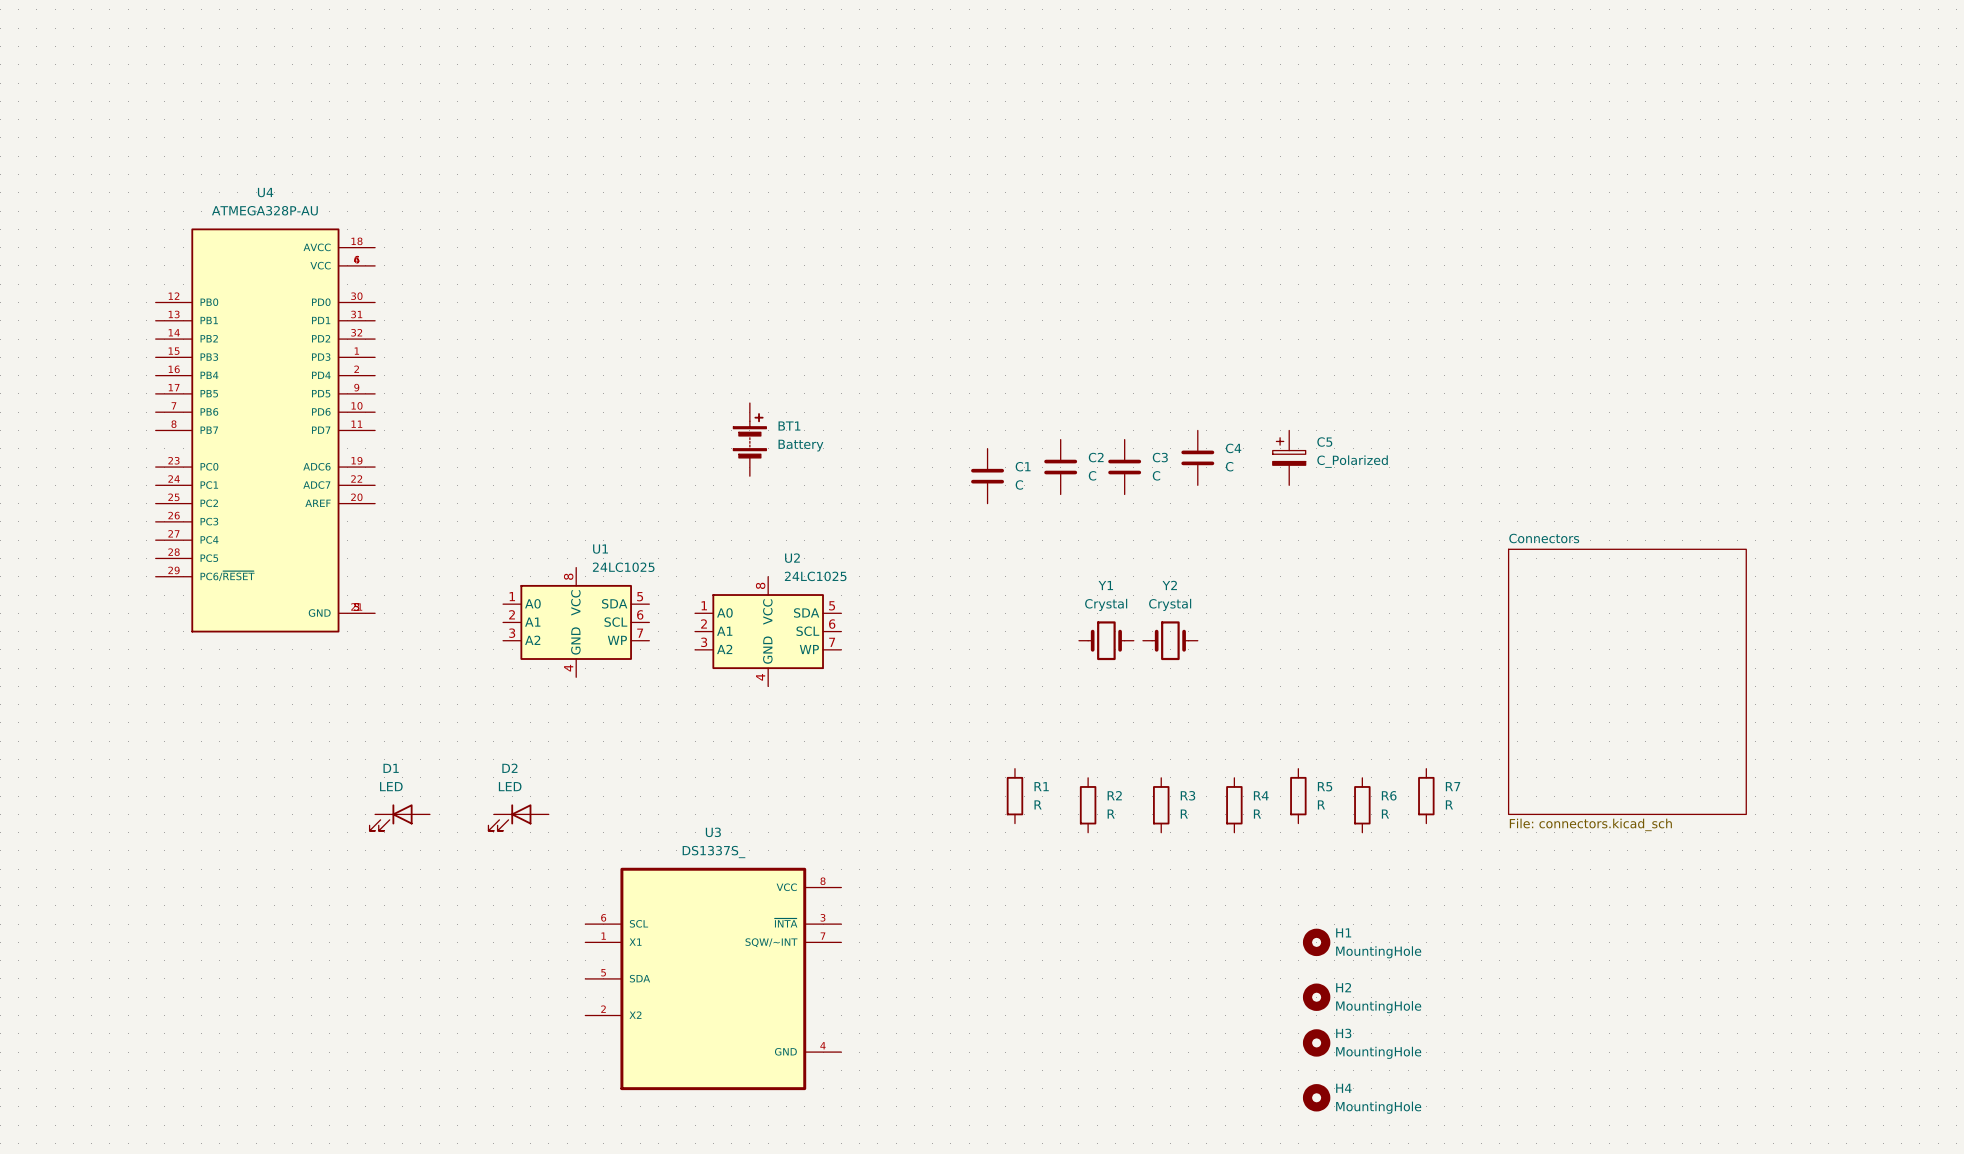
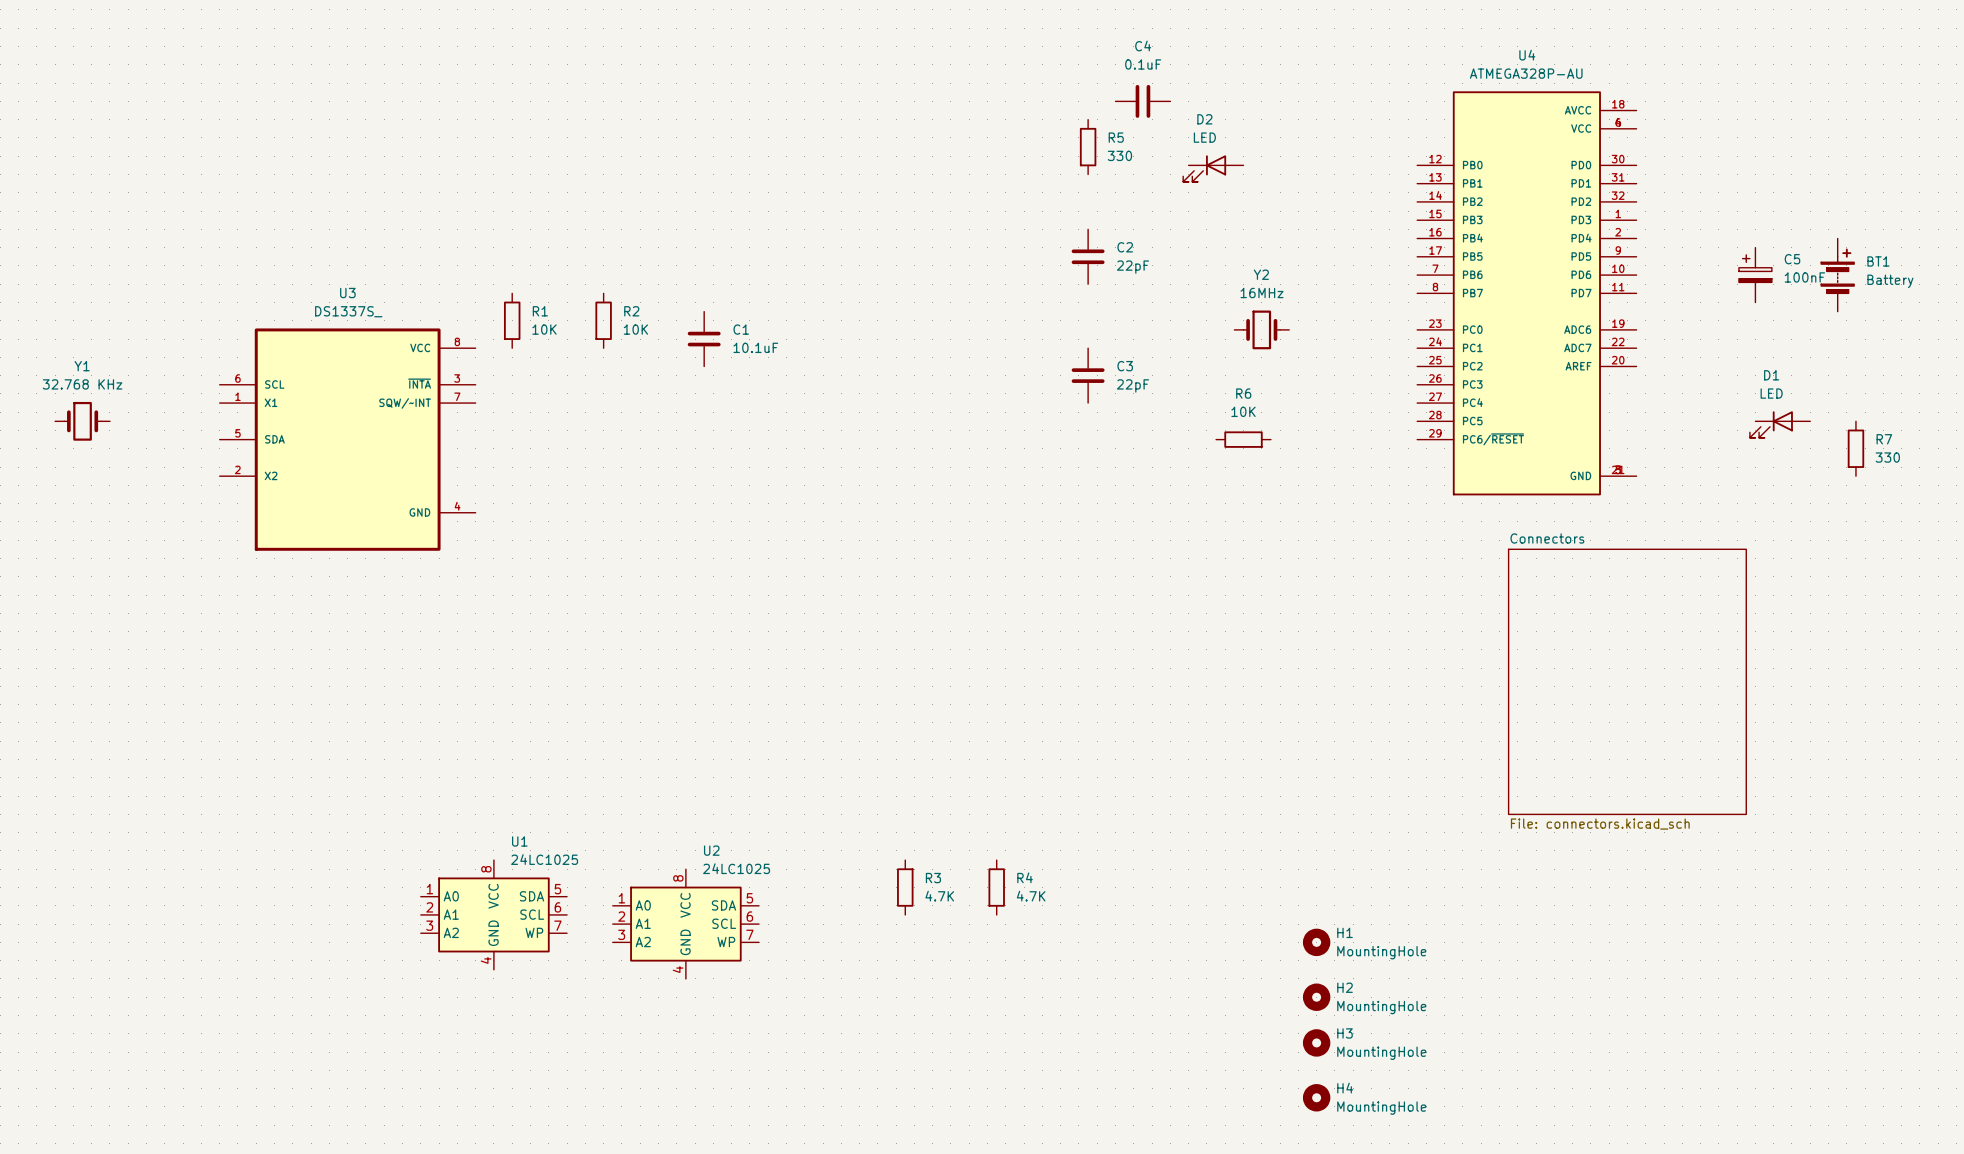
U4 position: (265, 430) -> (1526, 293)
BT1 position: (749, 439) -> (1837, 275)
C4 name position: C4 (1233, 448) -> C4 (1143, 45)
C4 rotation: 0° (1197, 457) -> 90° clockwise (1142, 101)
C4 position: (1197, 457) -> (1142, 101)
C5 position: (1289, 457) -> (1755, 275)
C5 value: C_Polarized (1352, 461) -> 100nF (1804, 277)
C4 value: C (1229, 466) -> 0.1uF (1143, 64)
C2 position: (1060, 467) -> (1088, 256)
C3 position: (1124, 467) -> (1088, 375)
C2 value: C (1092, 475) -> 22pF (1133, 267)
C3 value: C (1156, 475) -> 22pF (1133, 385)
C1 position: (987, 476) -> (704, 339)
C1 value: C (1019, 484) -> 10.1uF (755, 347)
Y1 value: Crystal (1106, 604) -> 32.768 KHz (82, 384)
Y2 value: Crystal (1170, 604) -> 16MHz (1262, 293)
U1 position: (576, 622) -> (493, 914)
U2 position: (768, 631) -> (685, 924)
Y1 position: (1106, 640) -> (82, 421)
Y2 position: (1170, 640) -> (1261, 329)
R6 name position: R6 (1389, 795) -> R6 (1243, 393)
R1 position: (1014, 796) -> (512, 320)
R5 position: (1298, 796) -> (1088, 147)
R7 position: (1426, 796) -> (1855, 448)
R1 value: R (1038, 804) -> 10K (544, 329)
R5 value: R (1321, 804) -> 330 (1119, 155)
R7 value: R (1449, 804) -> 330 (1887, 457)
R2 position: (1088, 805) -> (603, 320)
R3 position: (1161, 805) -> (905, 887)
R4 position: (1234, 805) -> (996, 887)
R6 rotation: 0° (1362, 805) -> 90° clockwise (1243, 439)
R6 position: (1362, 805) -> (1243, 439)
R2 value: R (1111, 814) -> 10K (635, 329)
R3 value: R (1184, 814) -> 4.7K (939, 896)
R4 value: R (1257, 814) -> 4.7K (1031, 896)
R6 value: R (1385, 814) -> 10K (1243, 411)
D1 position: (399, 817) -> (1780, 424)
D2 position: (518, 817) -> (1213, 168)
U3 position: (713, 978) -> (347, 439)

